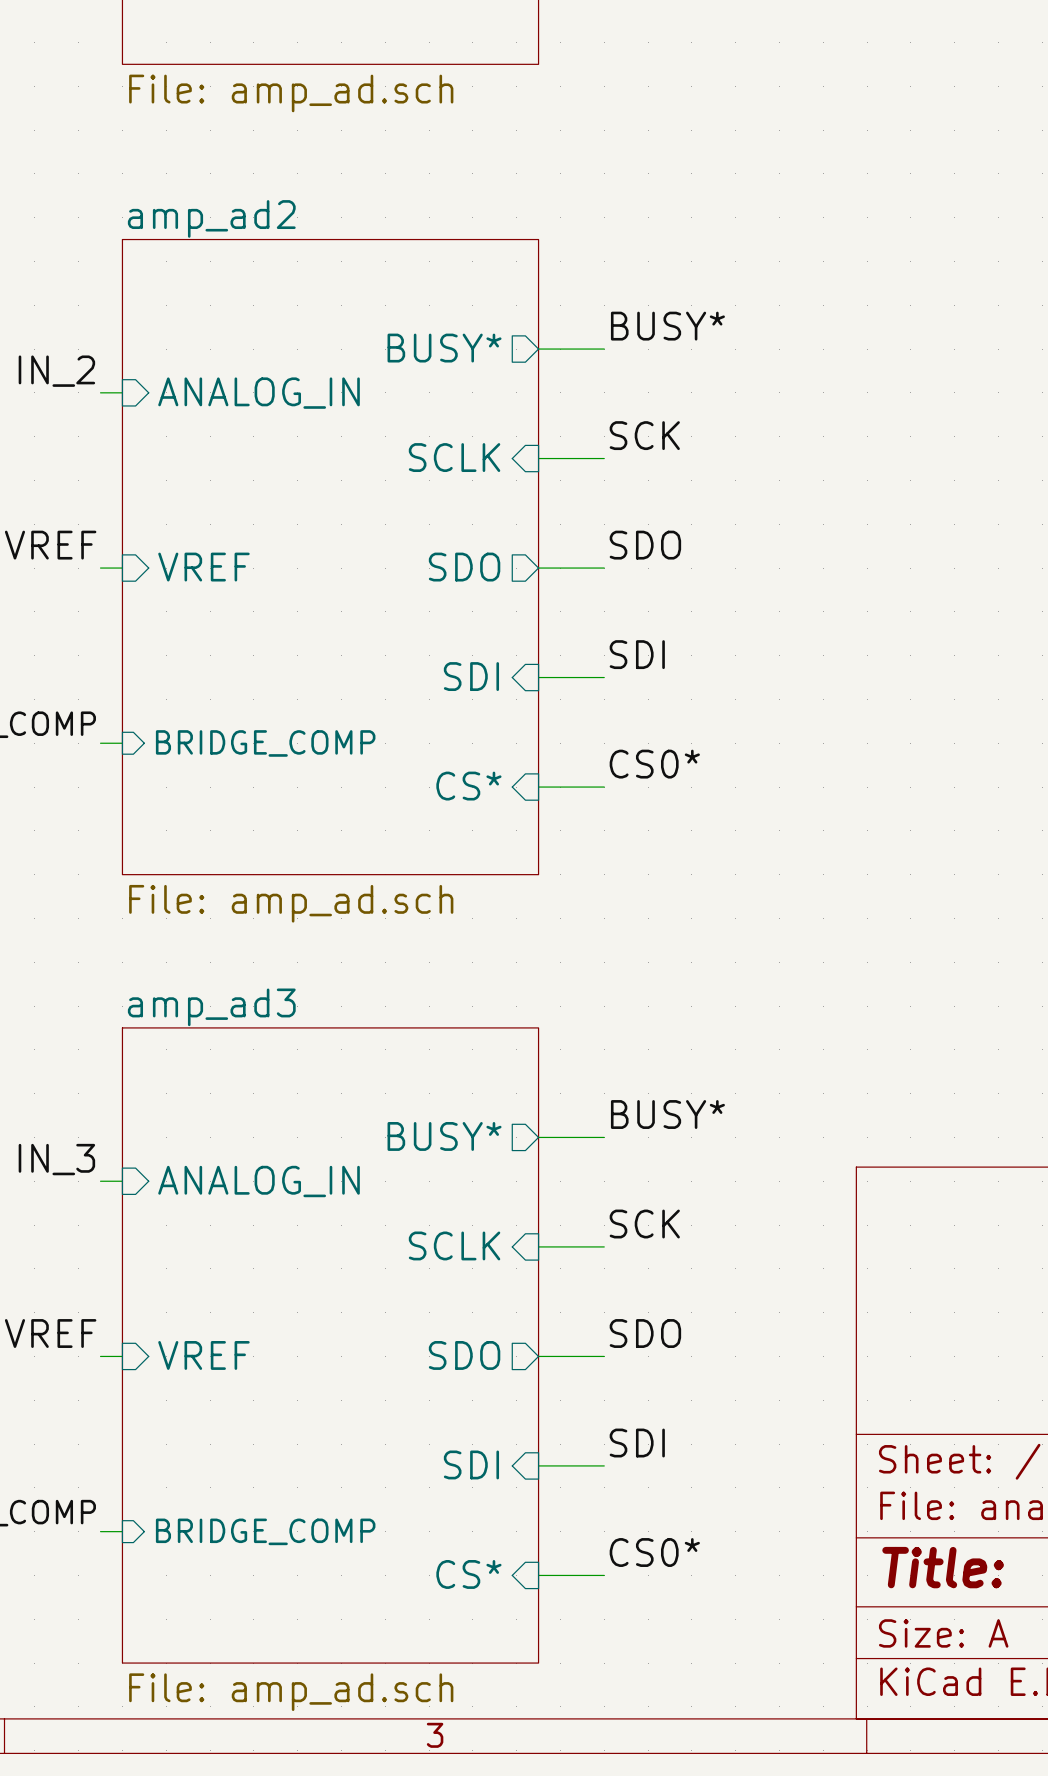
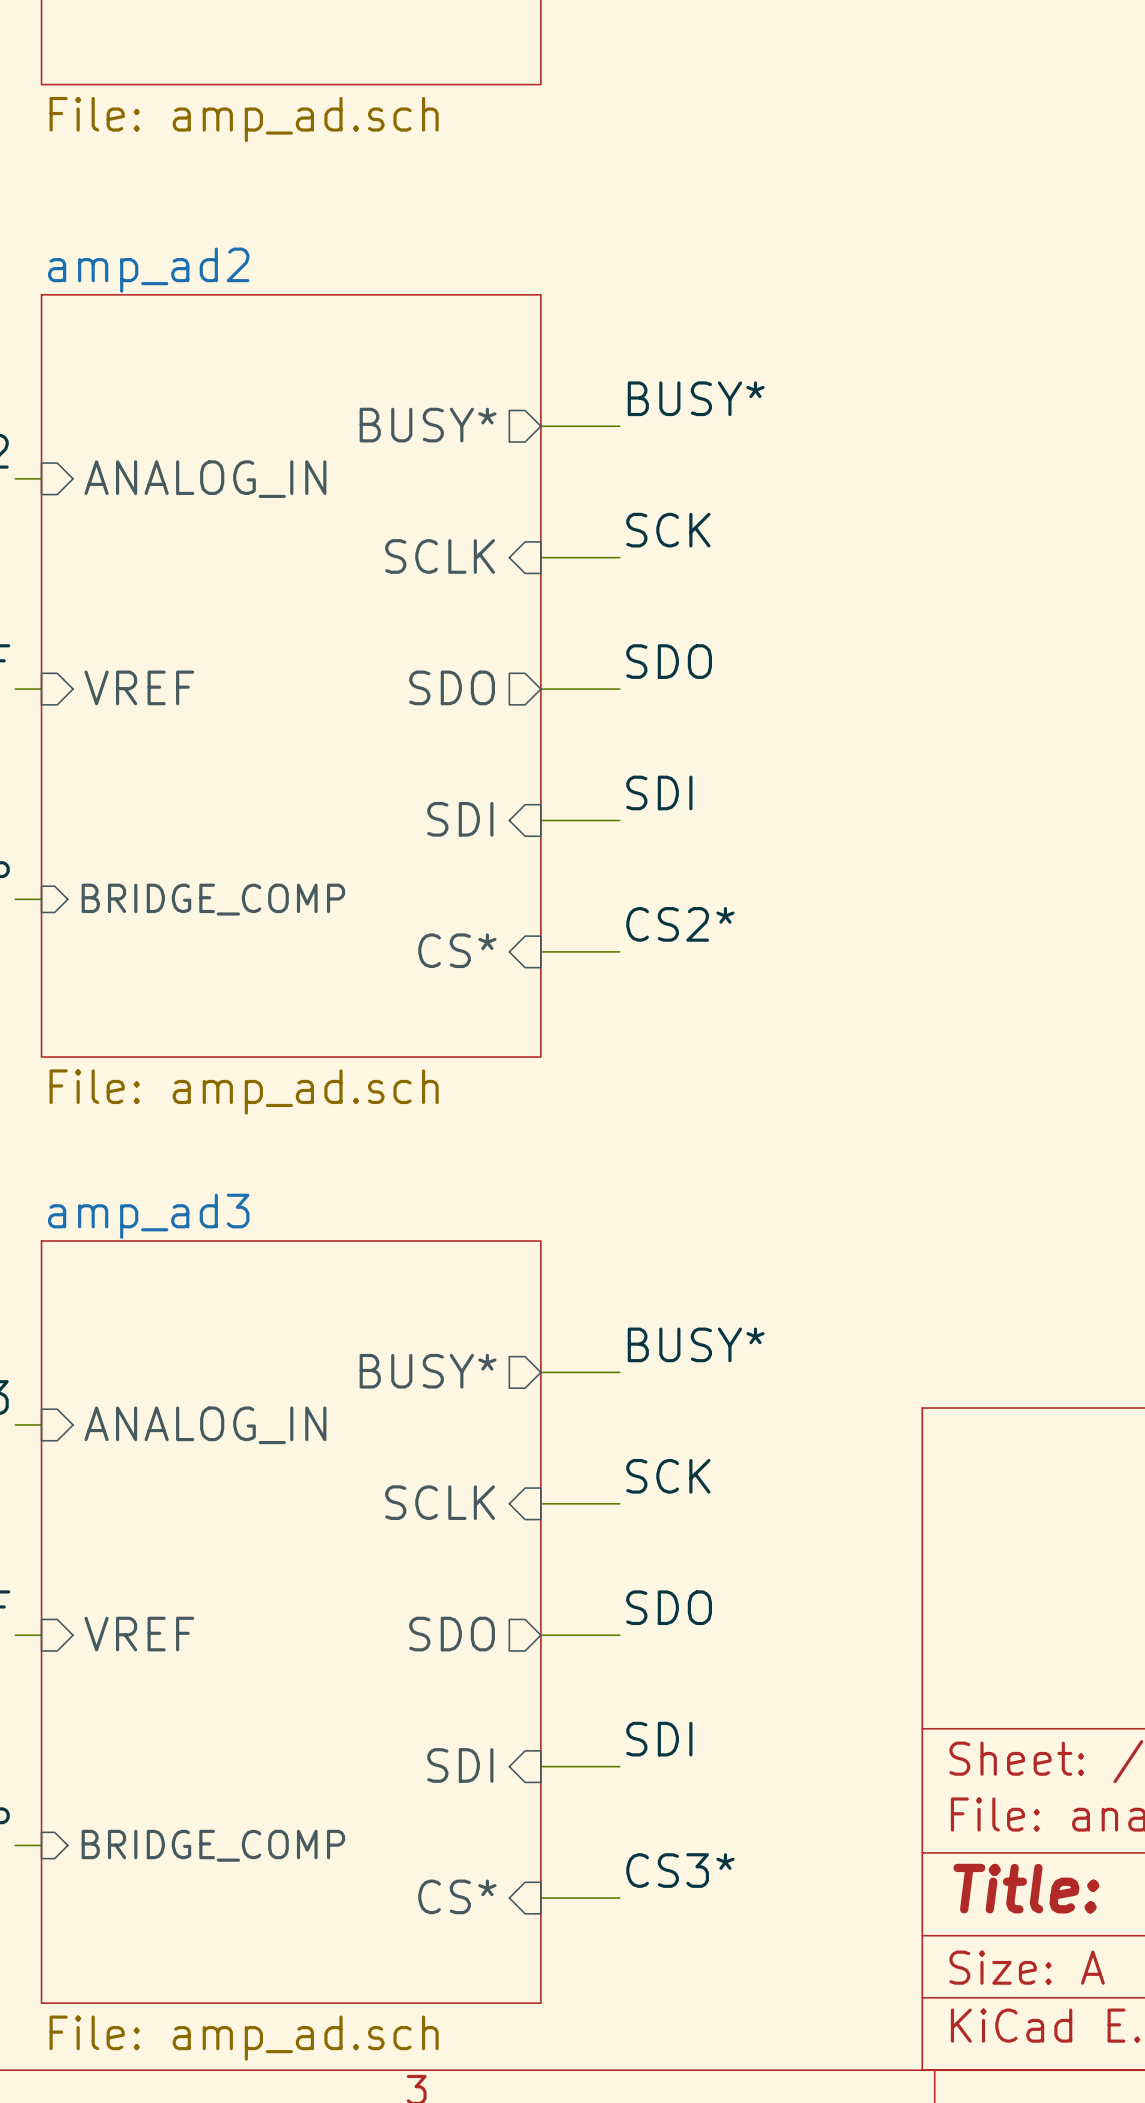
label: CS0* (654, 764) -> CS2* (680, 924)
label: CS0* (654, 1552) -> CS3* (680, 1870)

